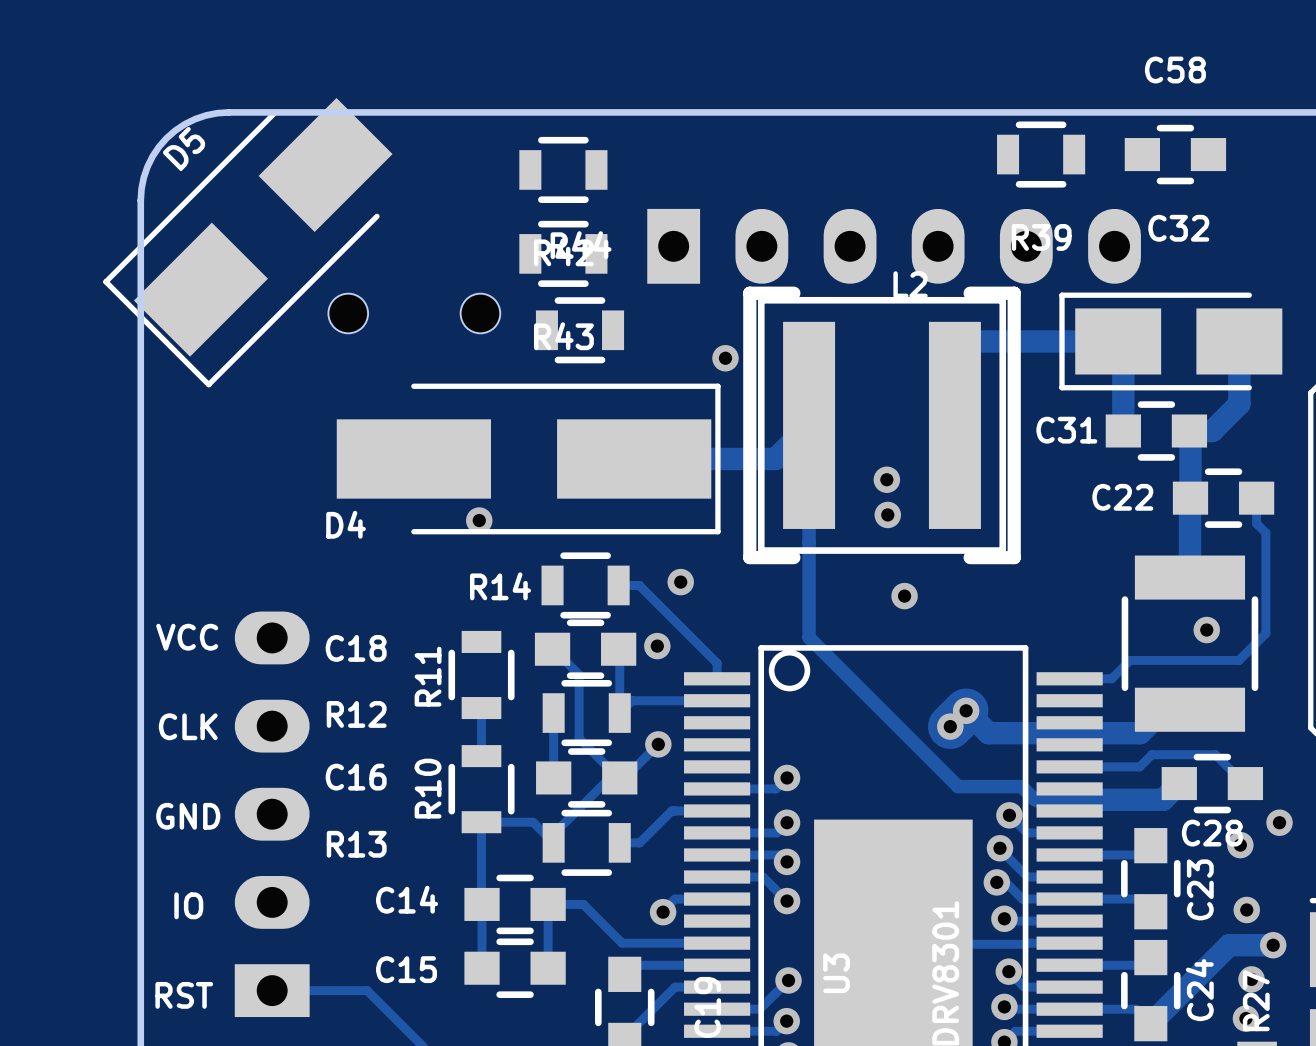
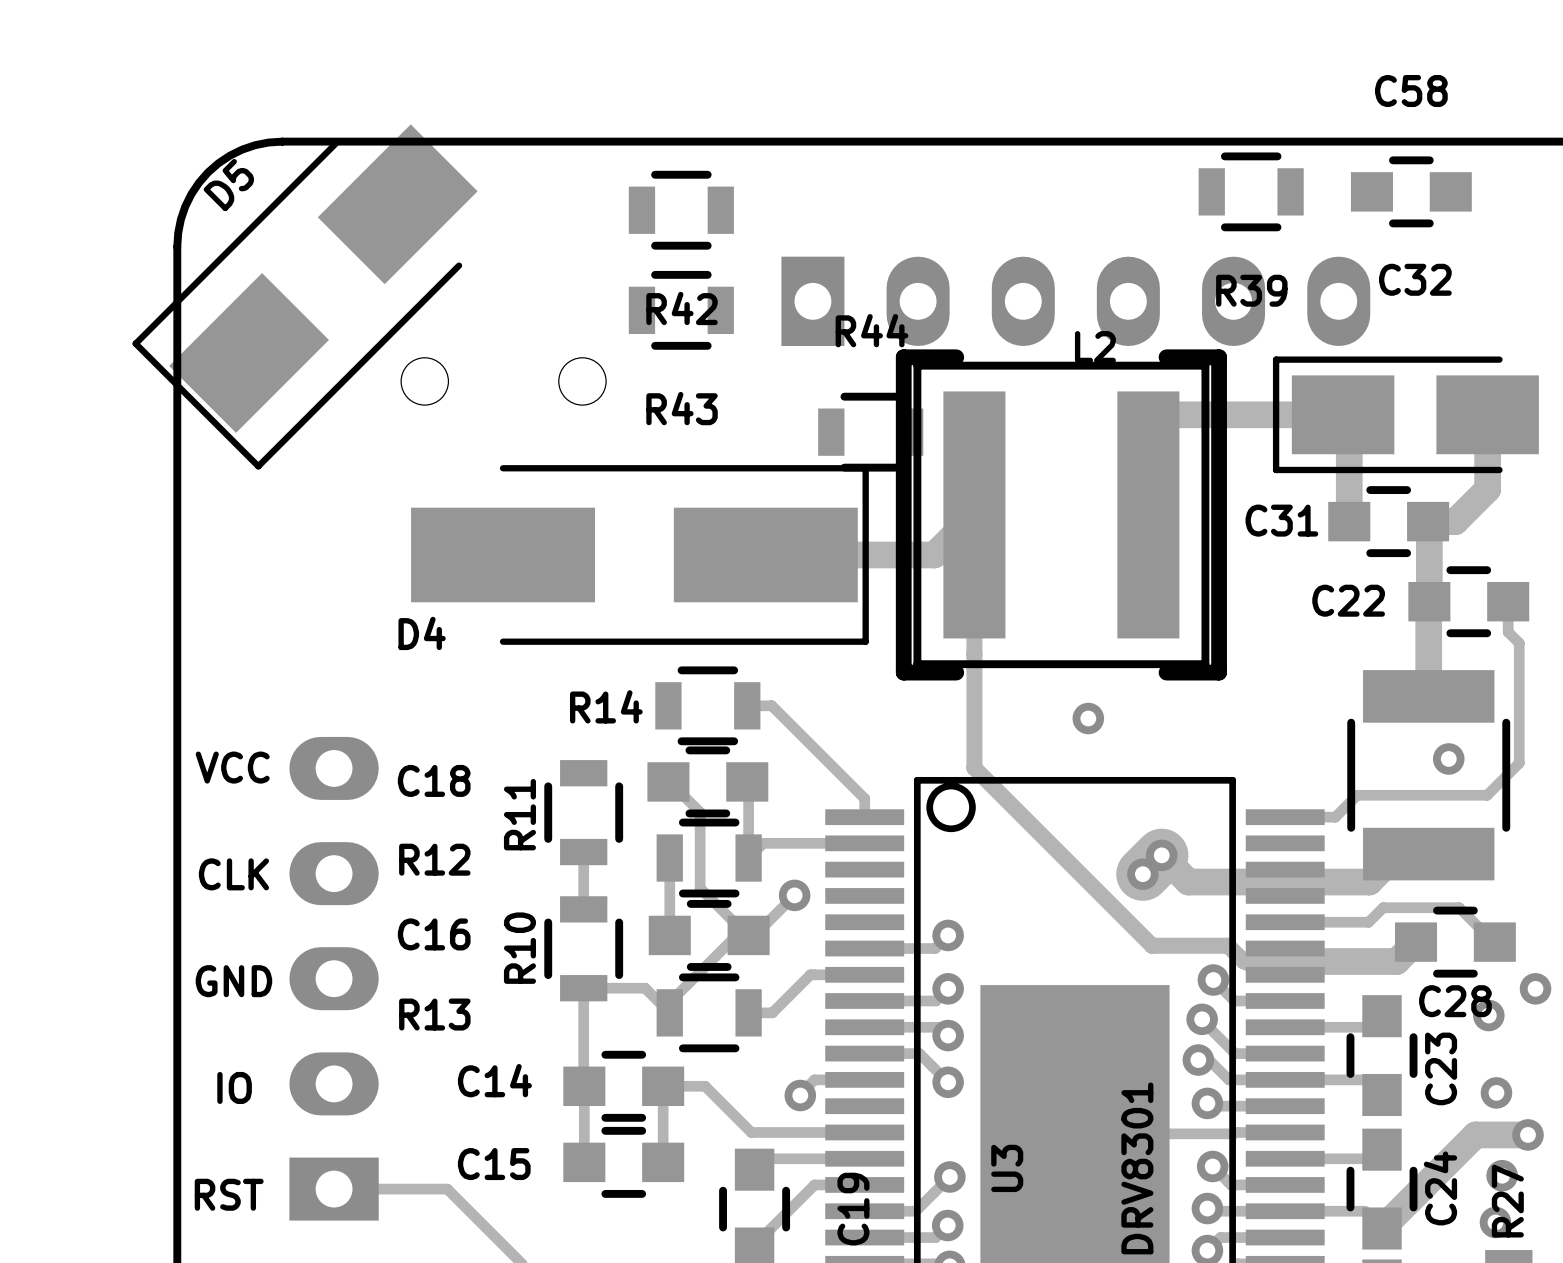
R44 position: (579, 330) -> (870, 432)
via: (725, 358) -> none
via: (886, 479) -> none
via: (887, 514) -> none
via: (479, 520) -> none
via: (680, 582) -> none
via: (657, 646) -> none

